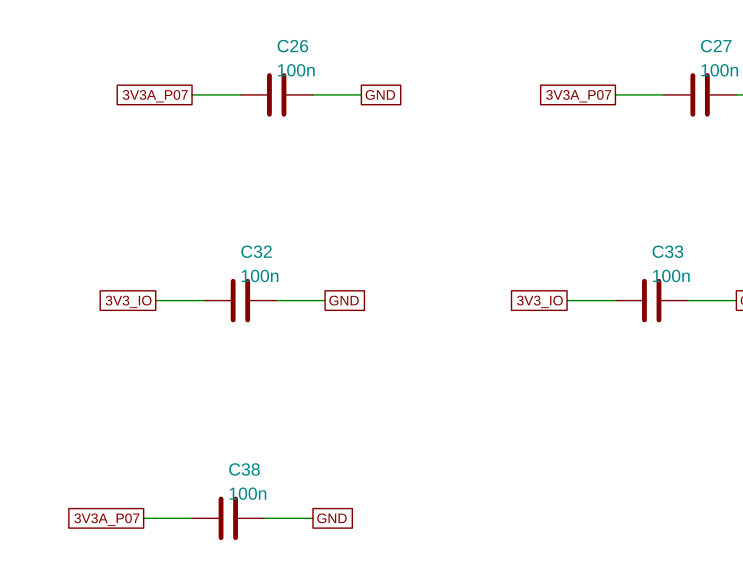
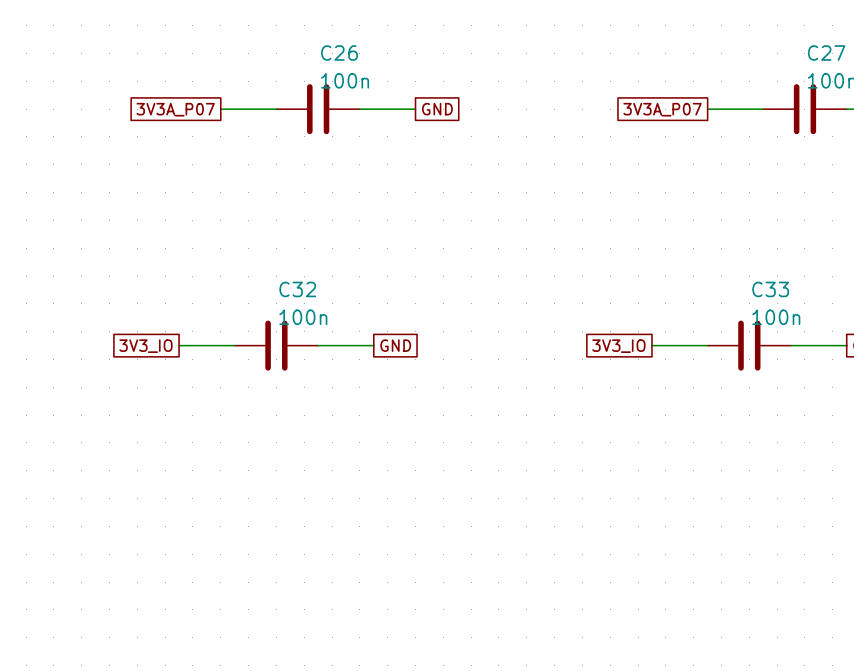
wire: (143, 518) (192, 518) -> none
C38: 100n (228, 518) -> none
wire: (264, 518) (312, 518) -> none
global label: GND (331, 518) -> none
global label: 3V3A_P07 (106, 519) -> none

